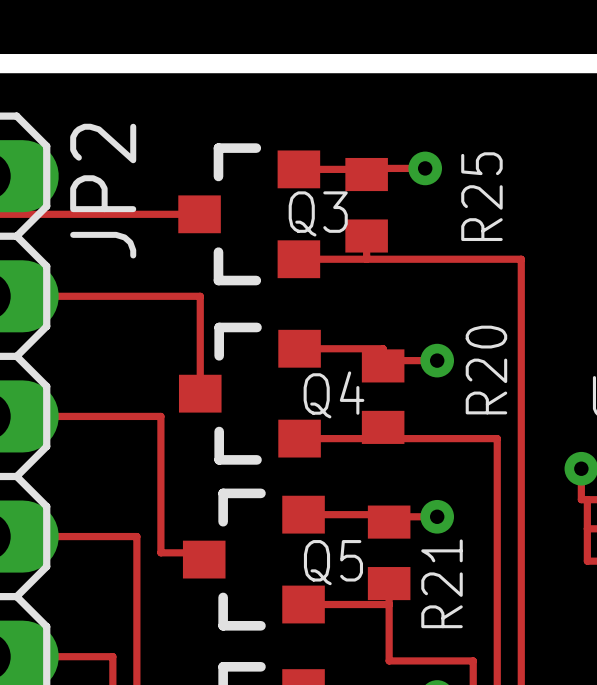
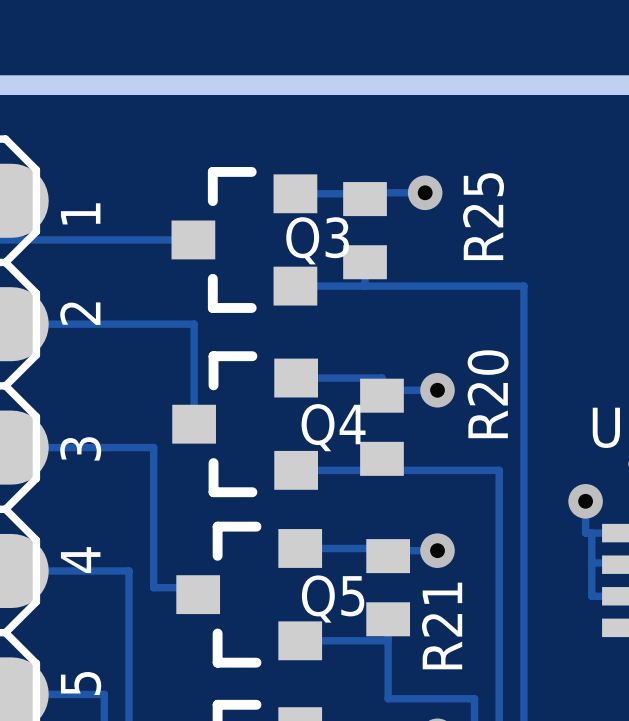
text: none -> 1 (80, 213)
JP2 name: JP2 (103, 191) -> none
text: none -> 2 (80, 313)
text: none -> 3 (80, 448)
text: none -> 4 (80, 560)
text: none -> 5 (81, 683)

